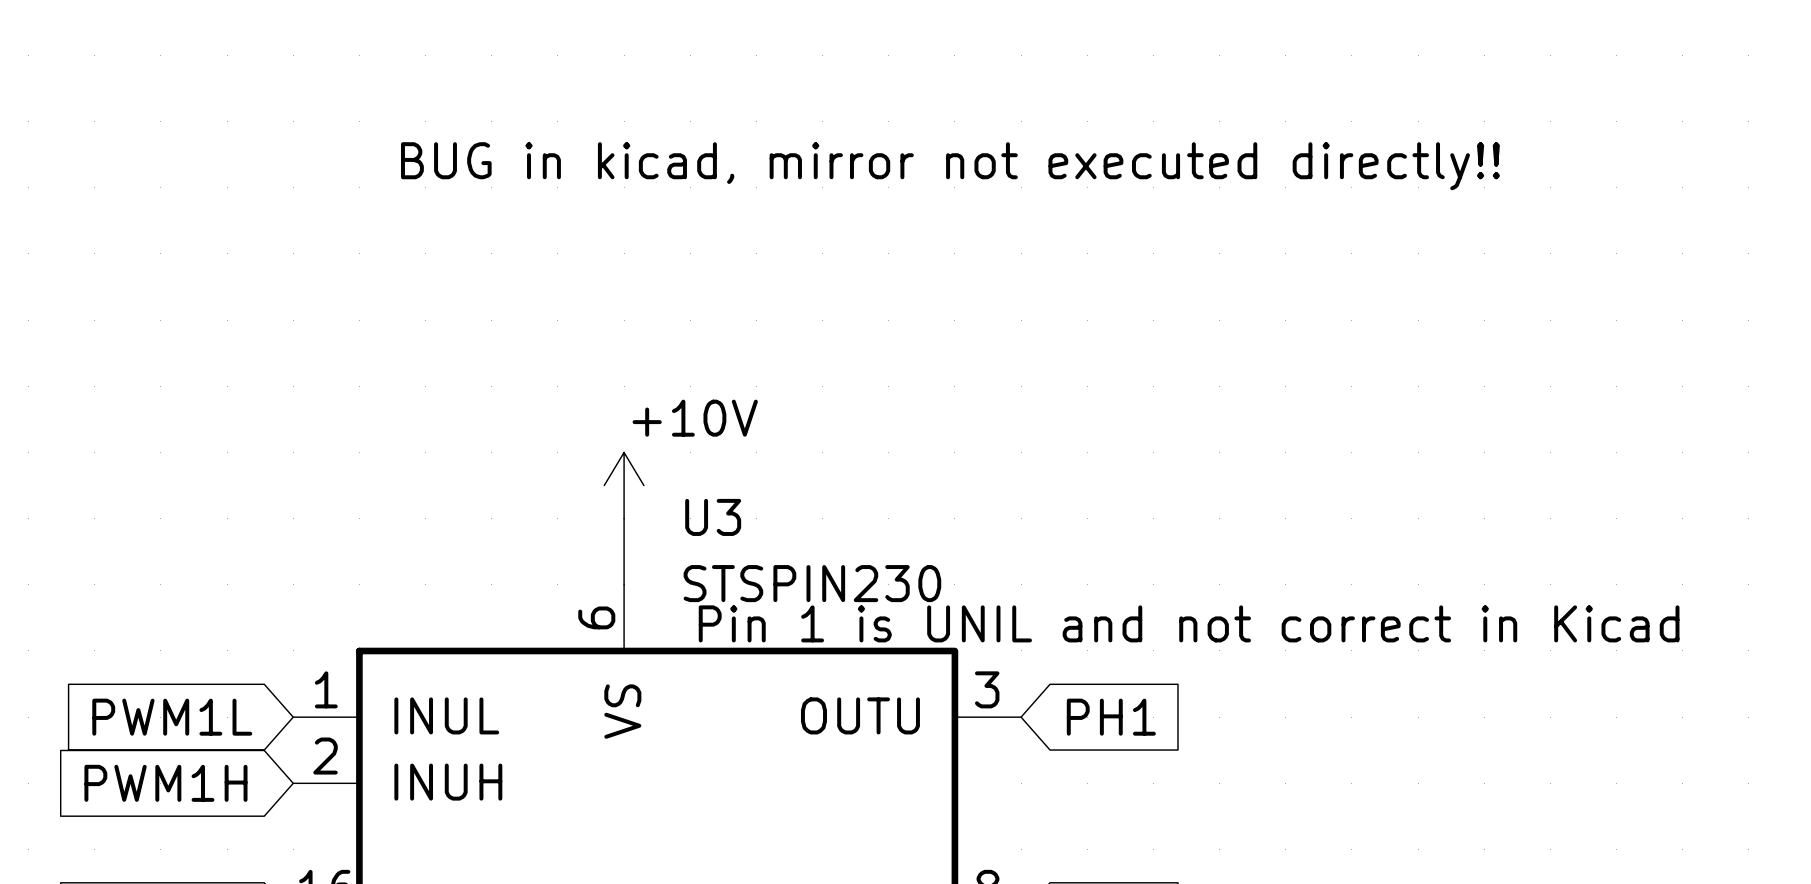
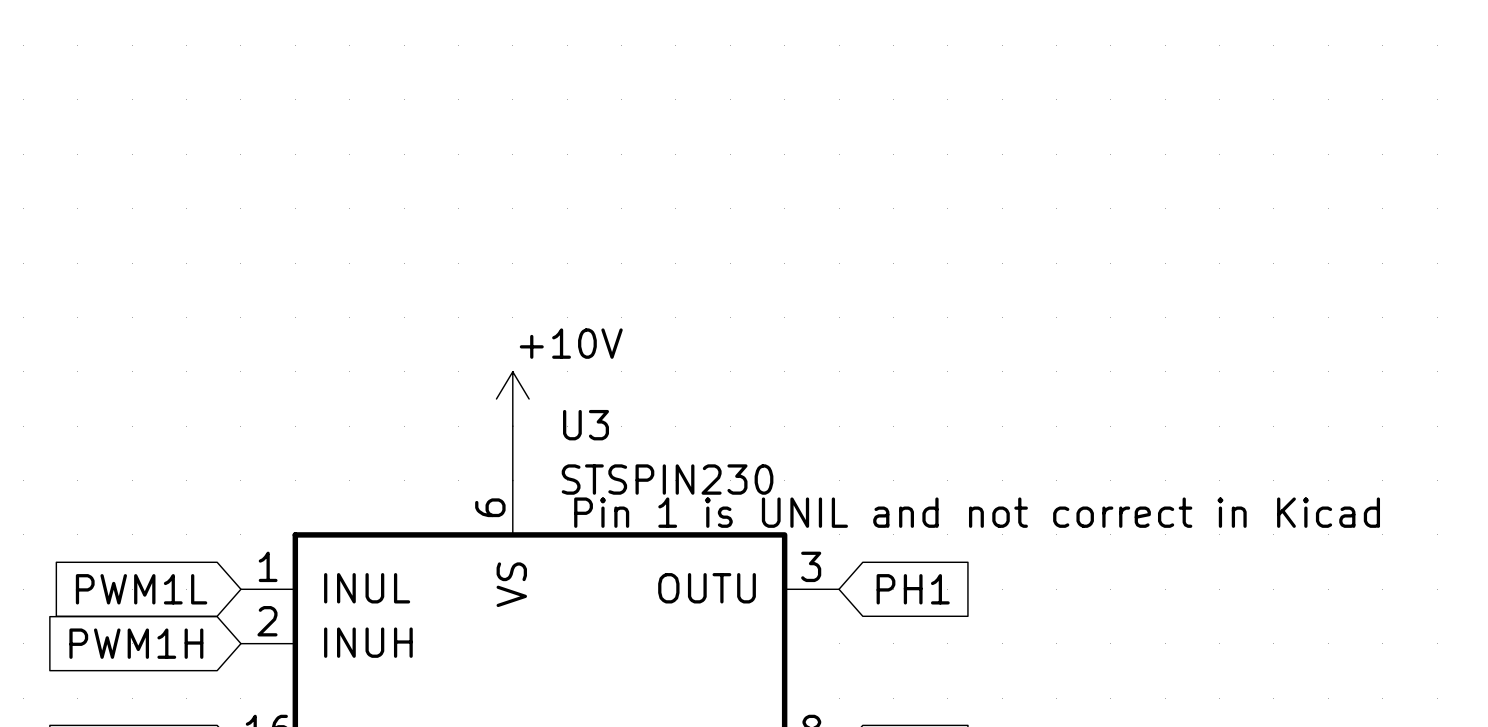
text: BUG in kicad, mirror not executed directly!! (950, 166) -> none

